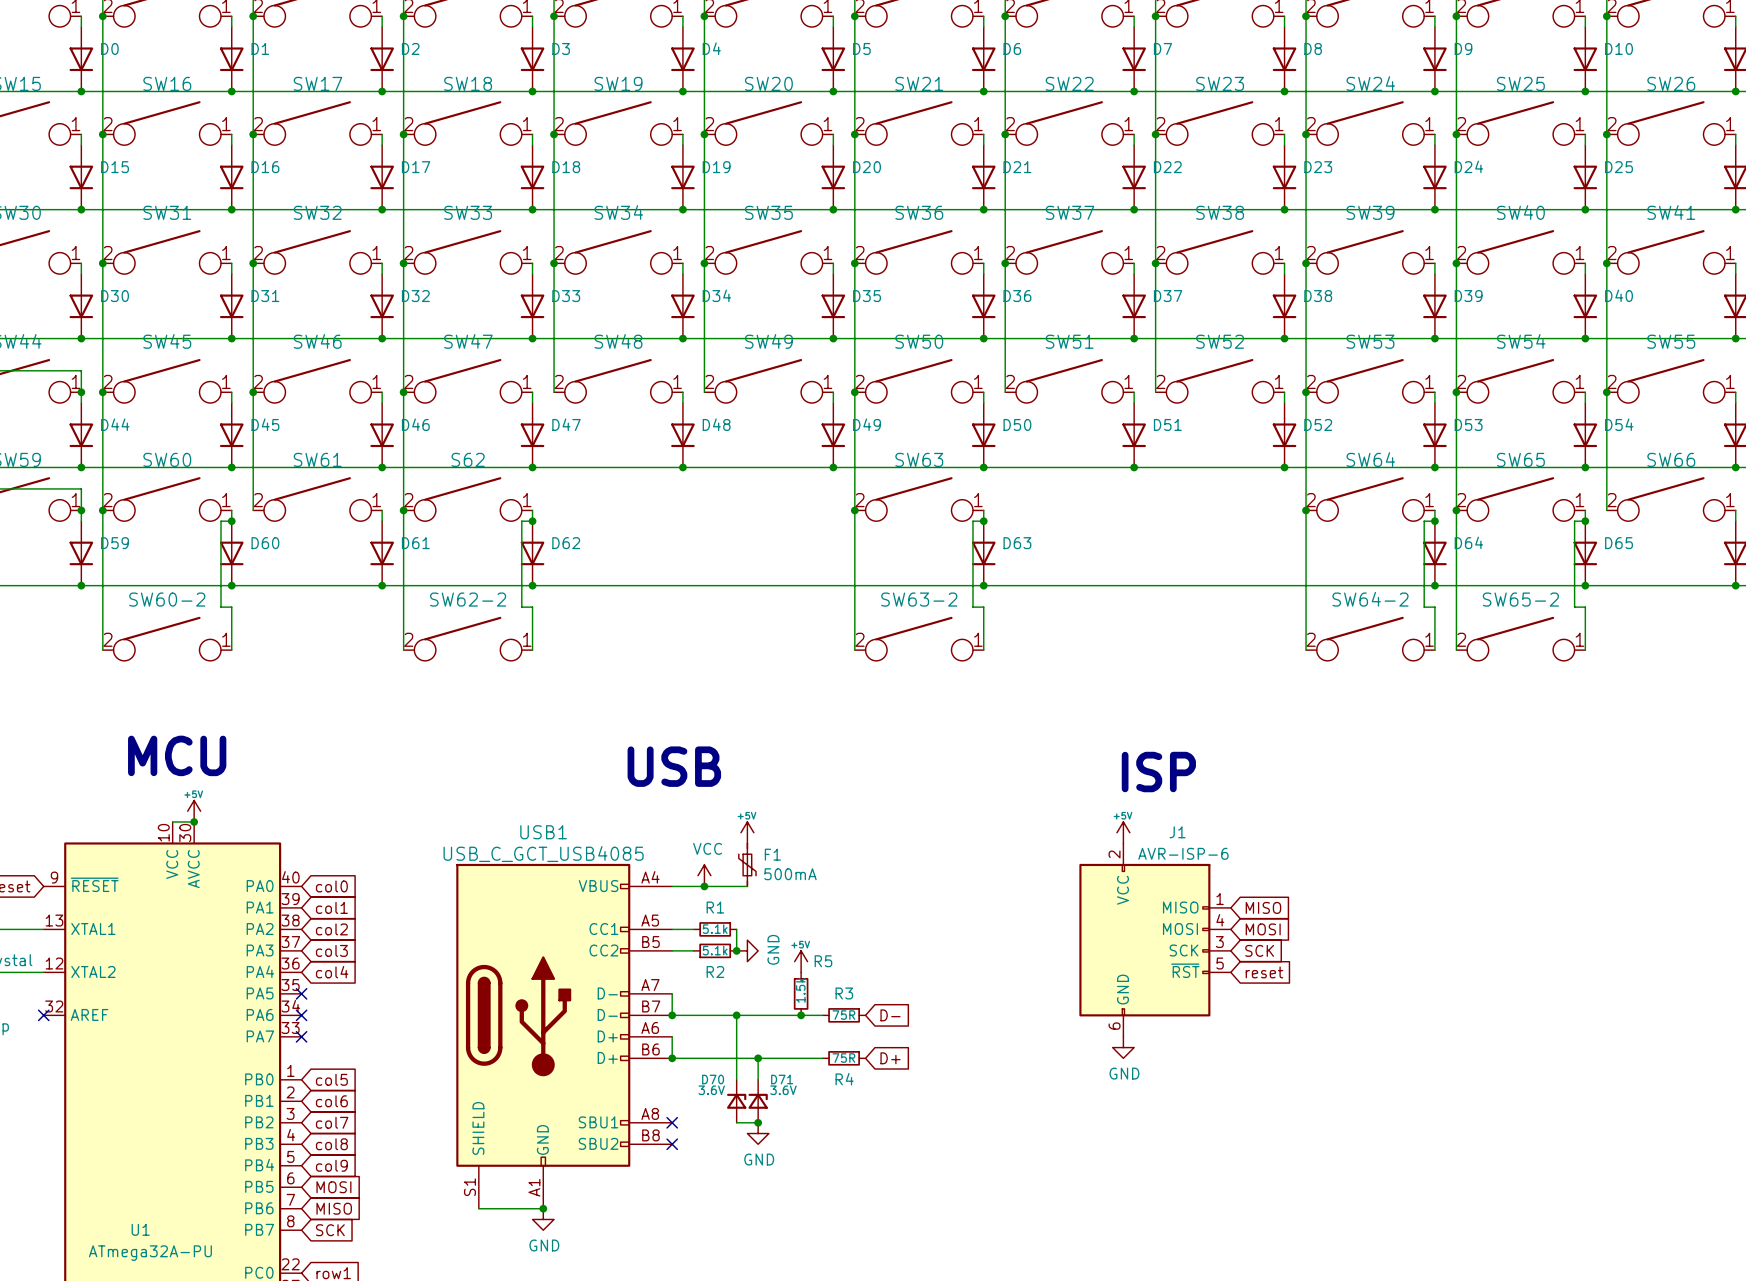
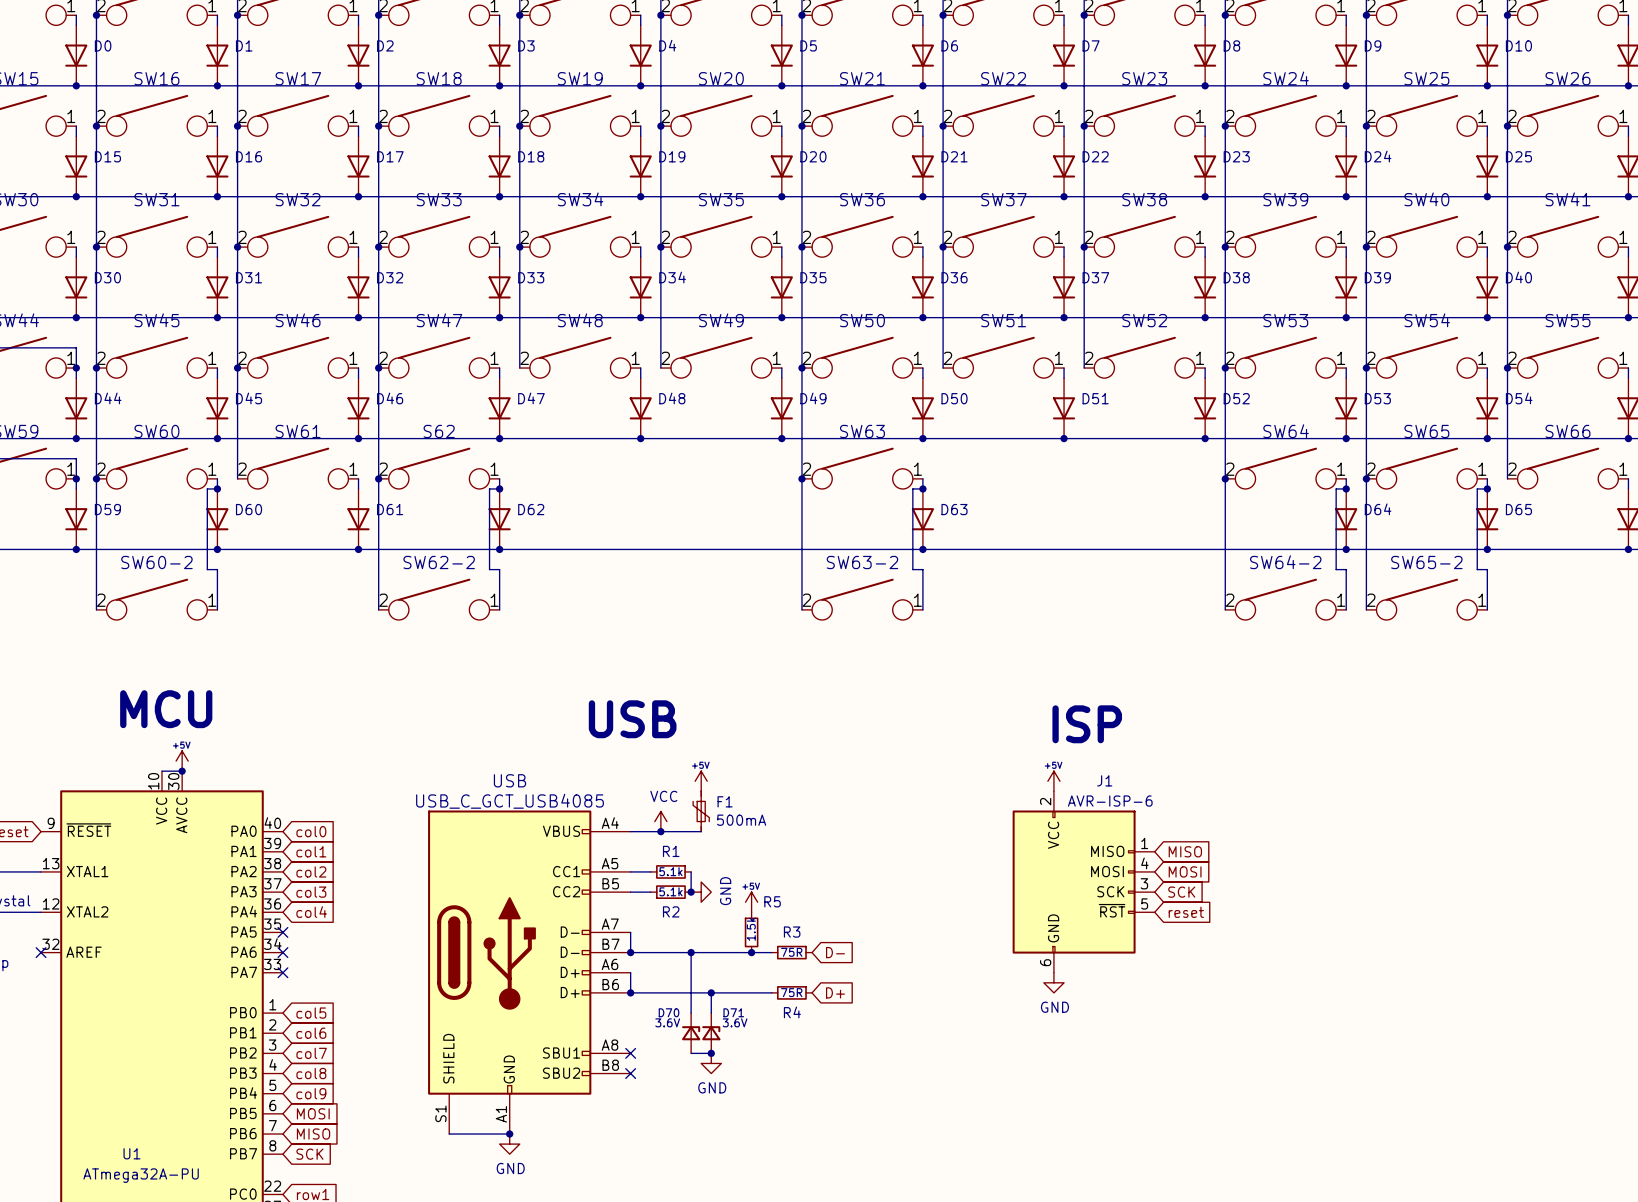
USB1 name: USB1 (543, 832) -> USB (509, 780)

